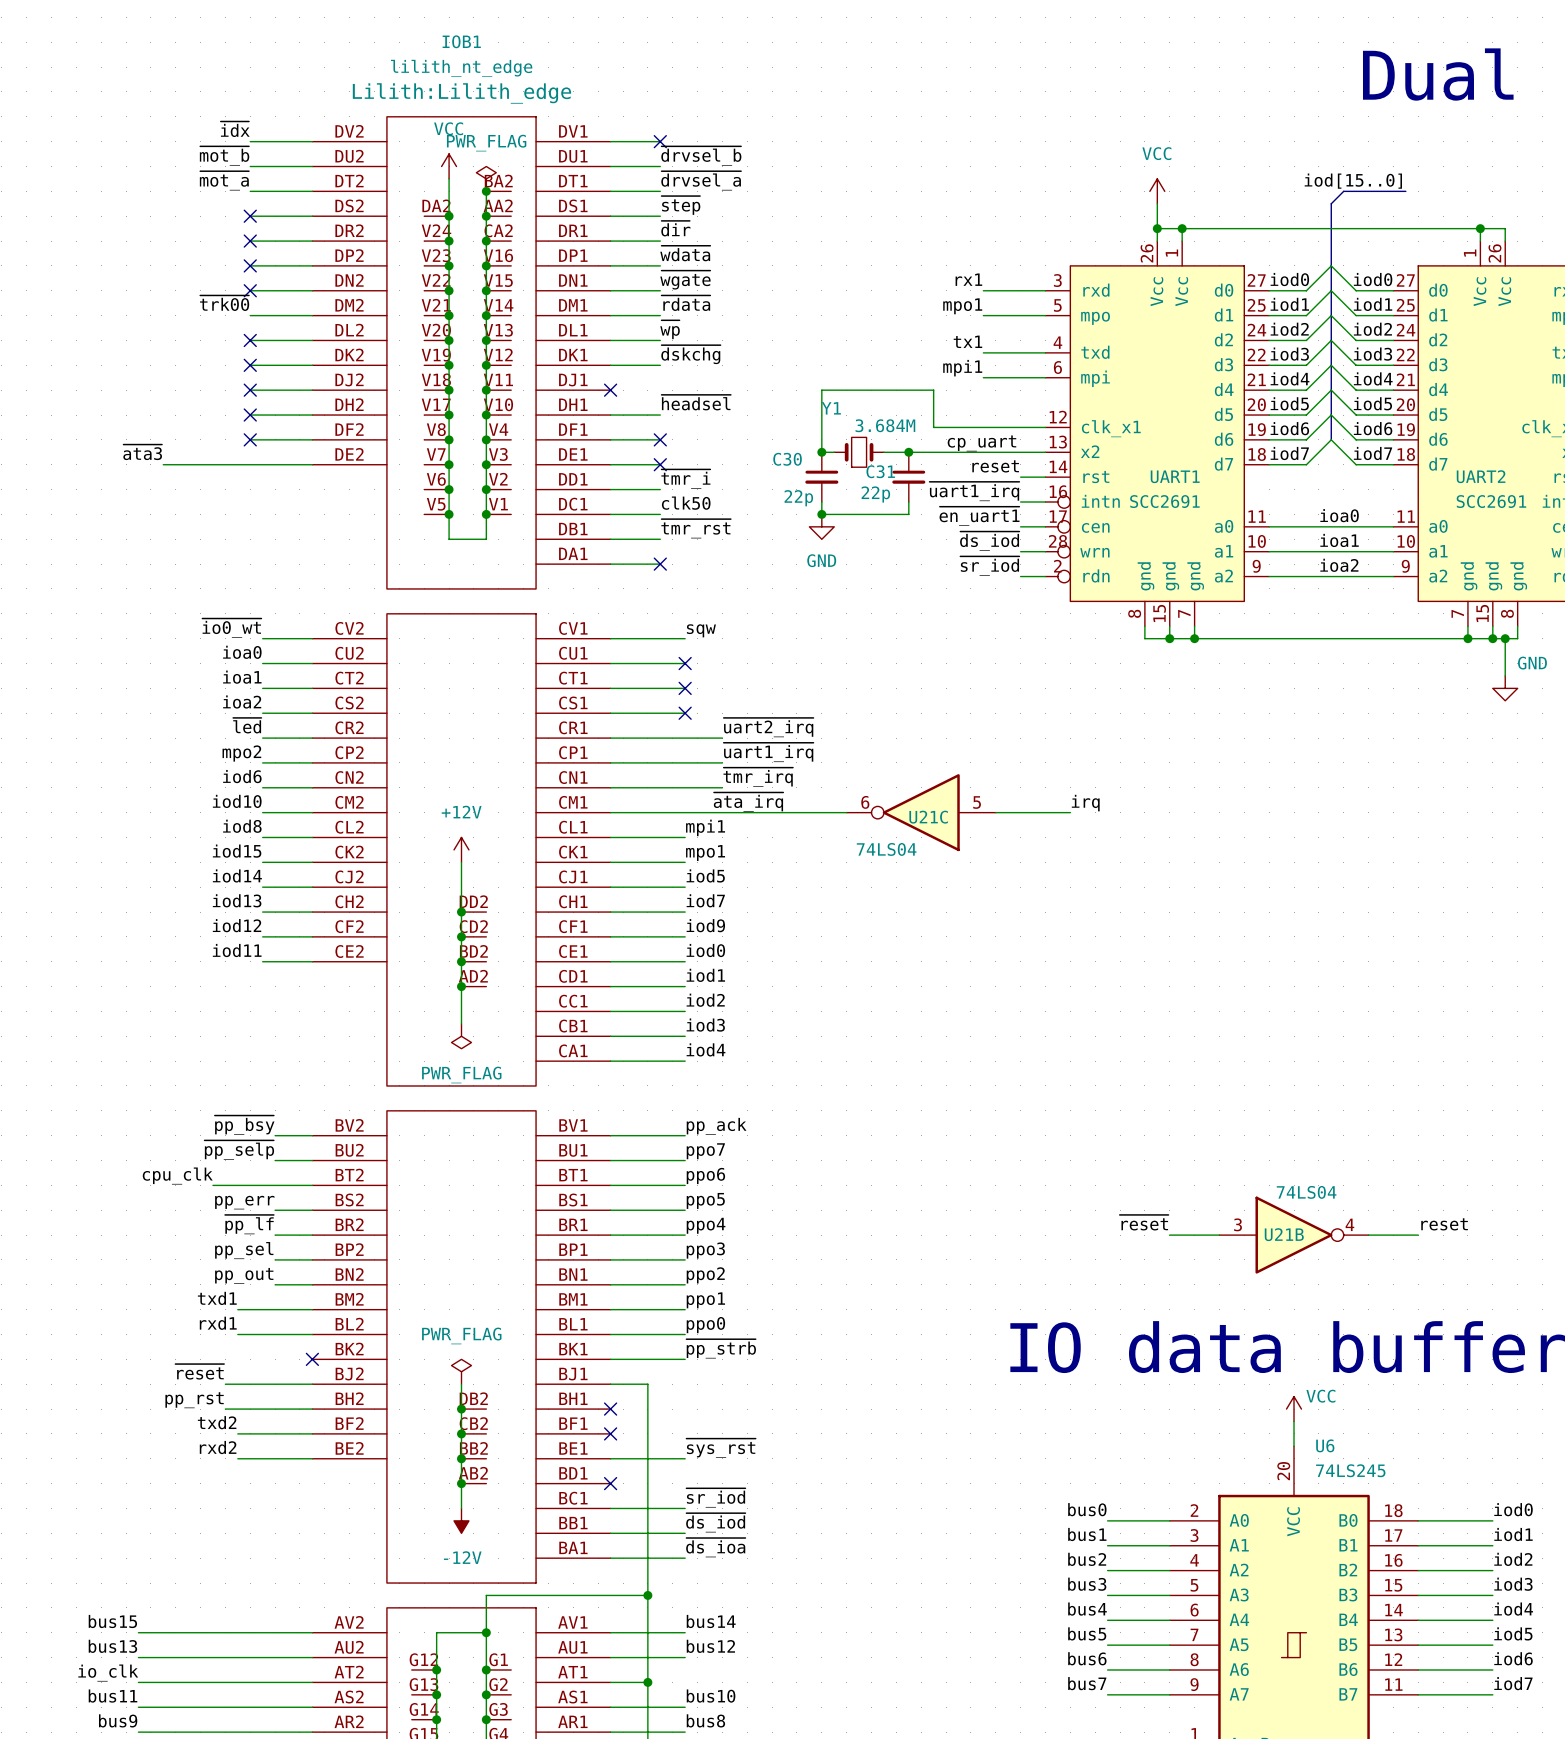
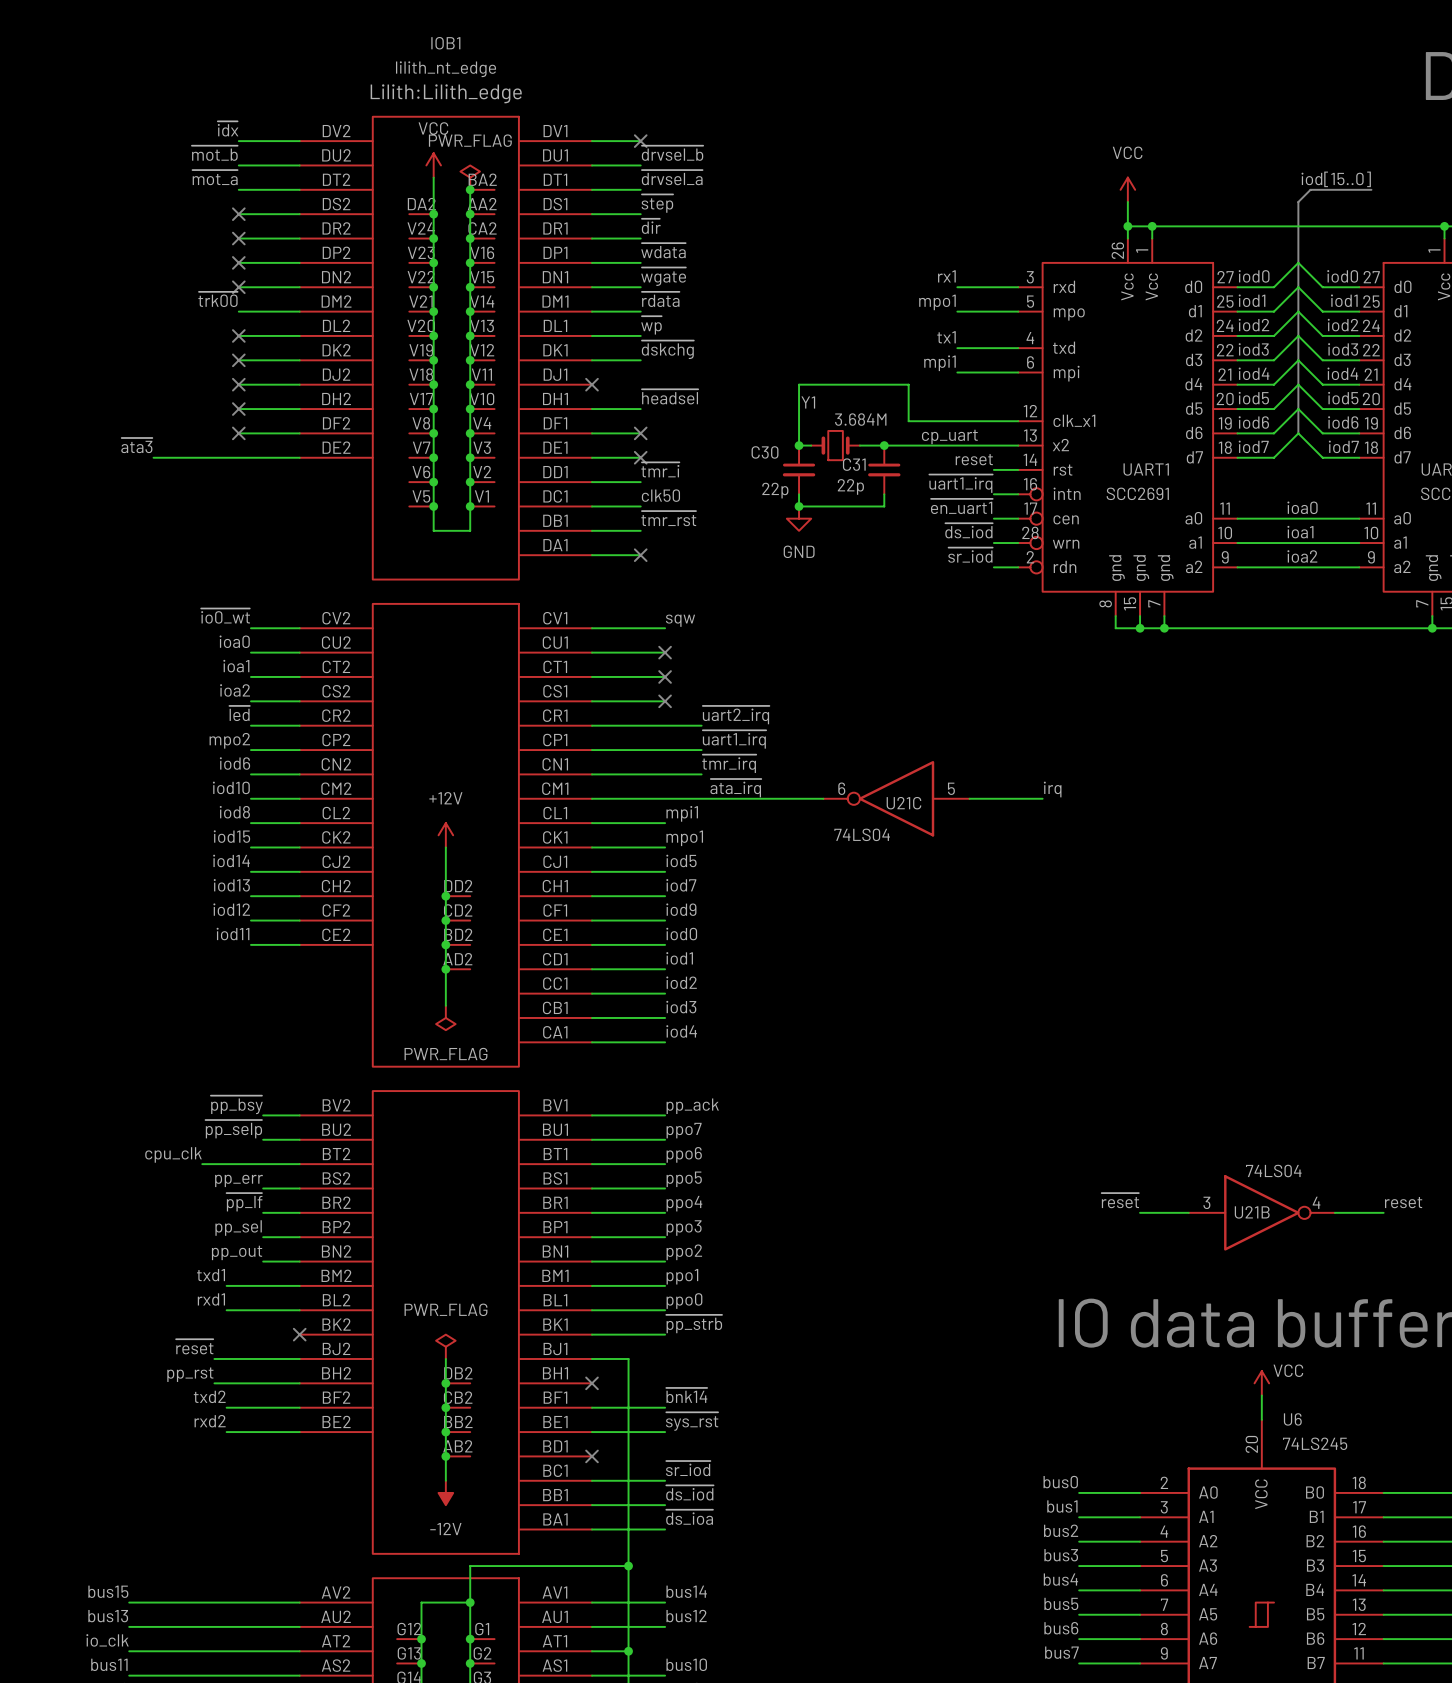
label: none -> ~{bnk14} (686, 1395)
wire: none -> (592, 1407) (665, 1407)
no-connect mark: (610, 1433) -> none

